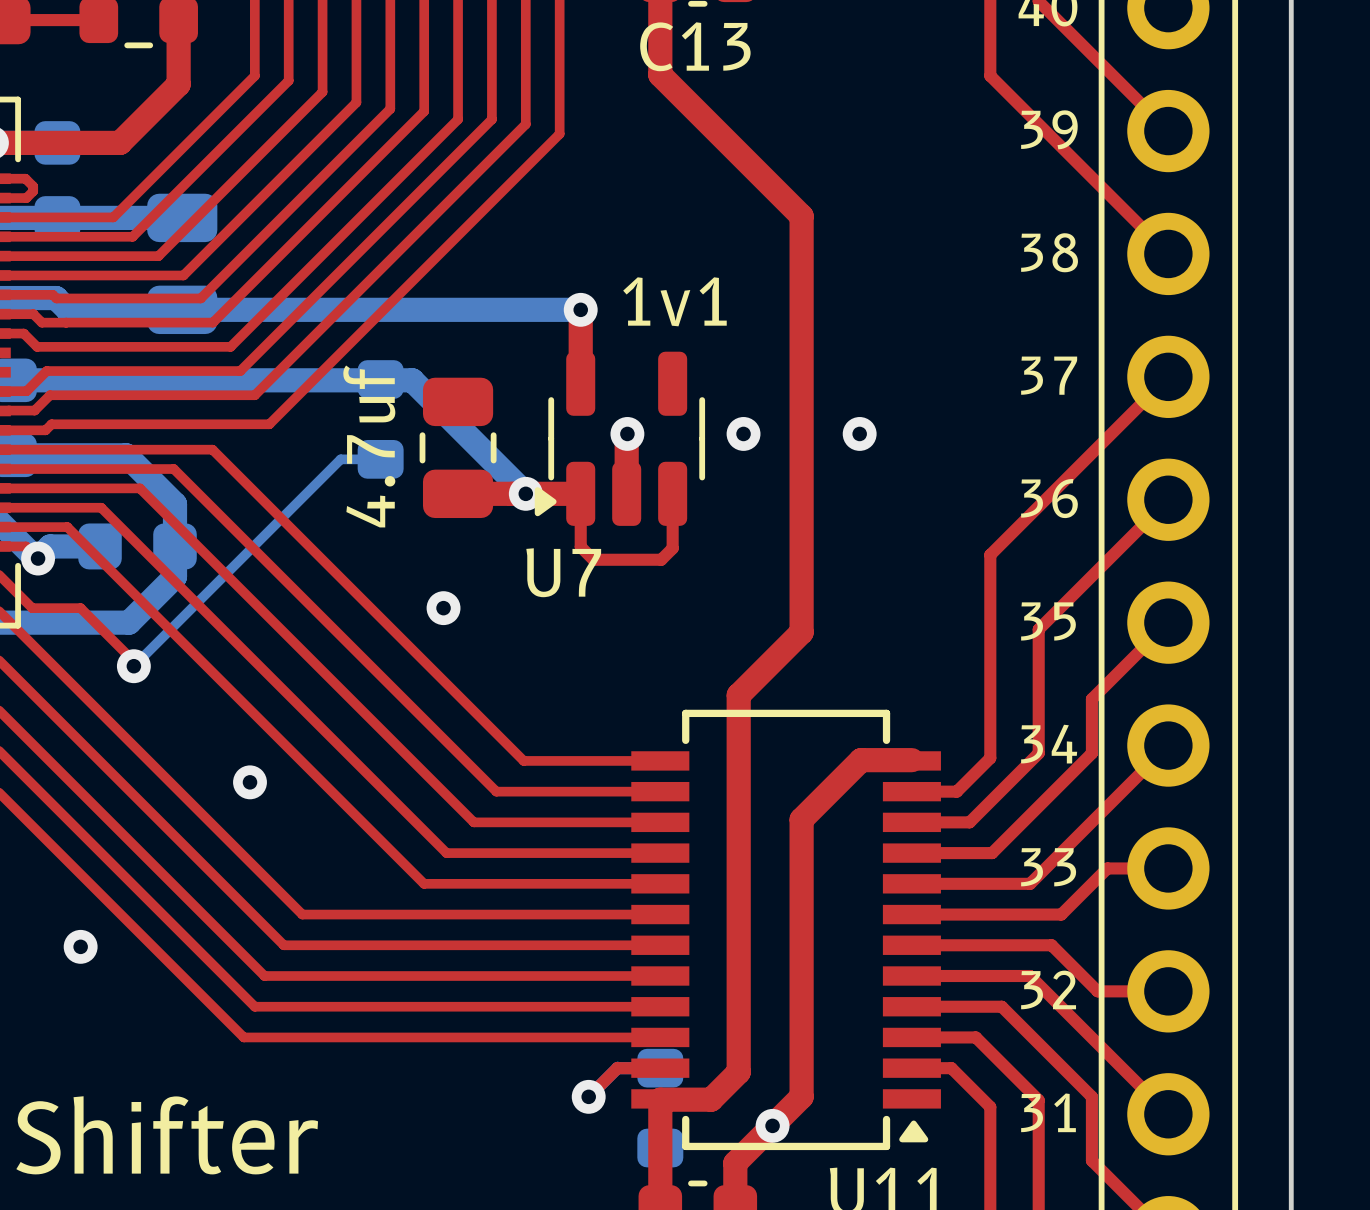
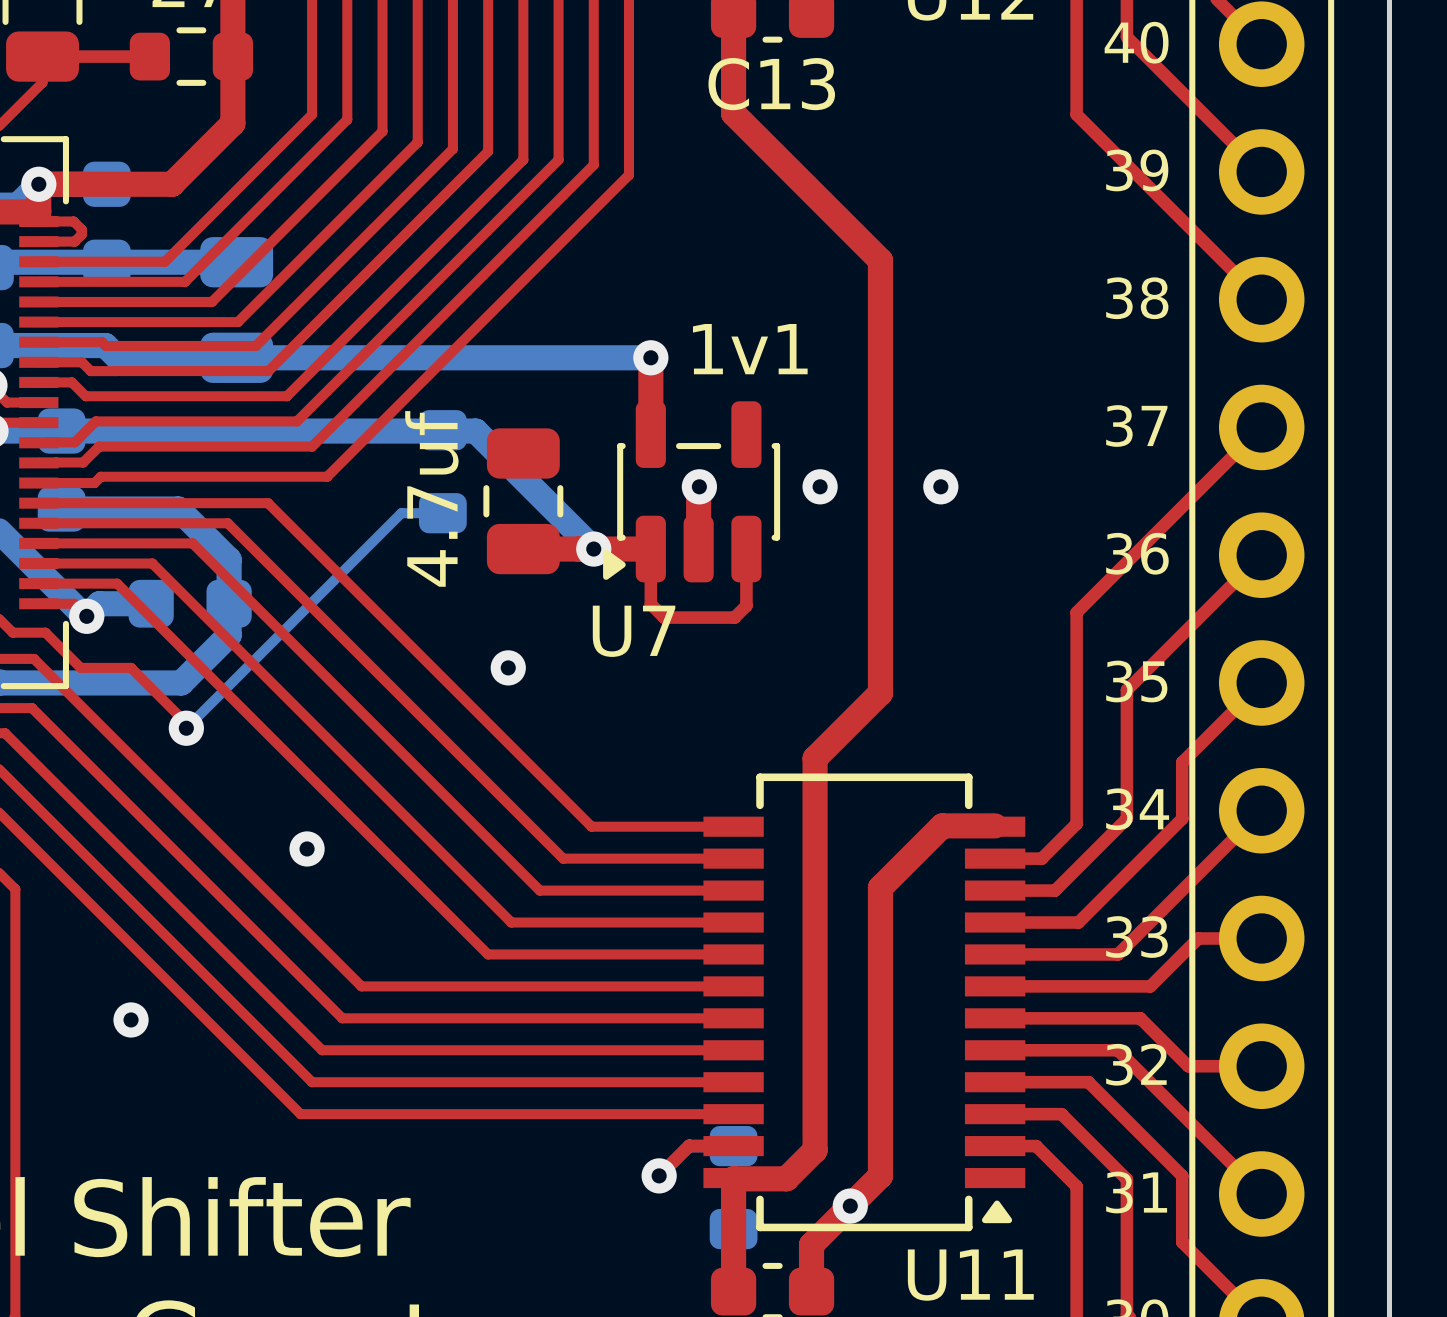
U7 footprint: [534, 351, 706, 526] -> [603, 401, 781, 583]

